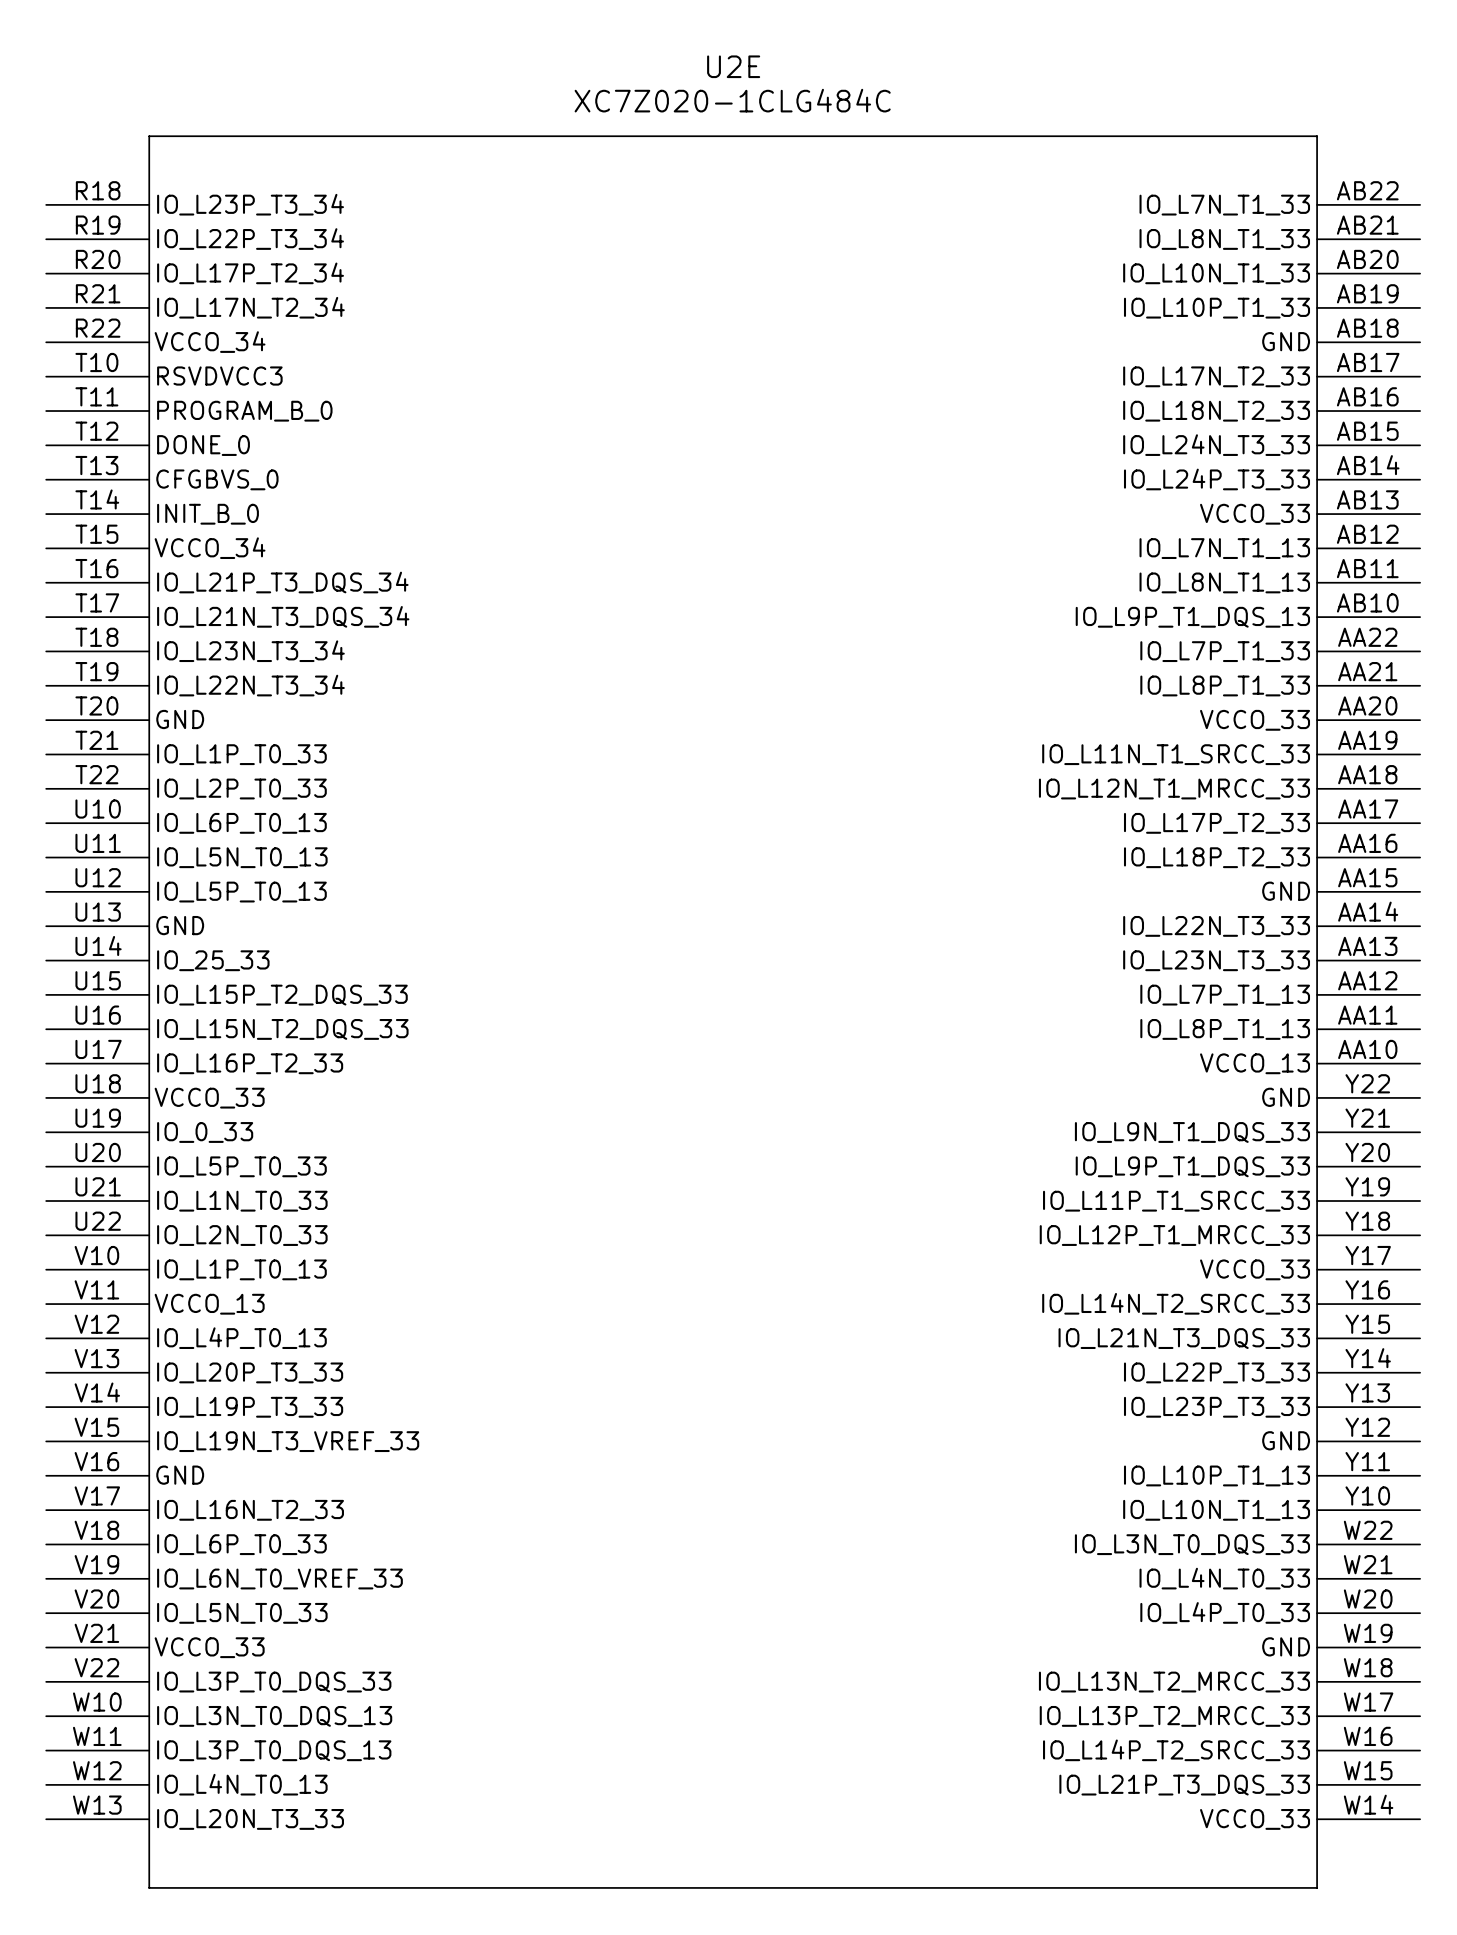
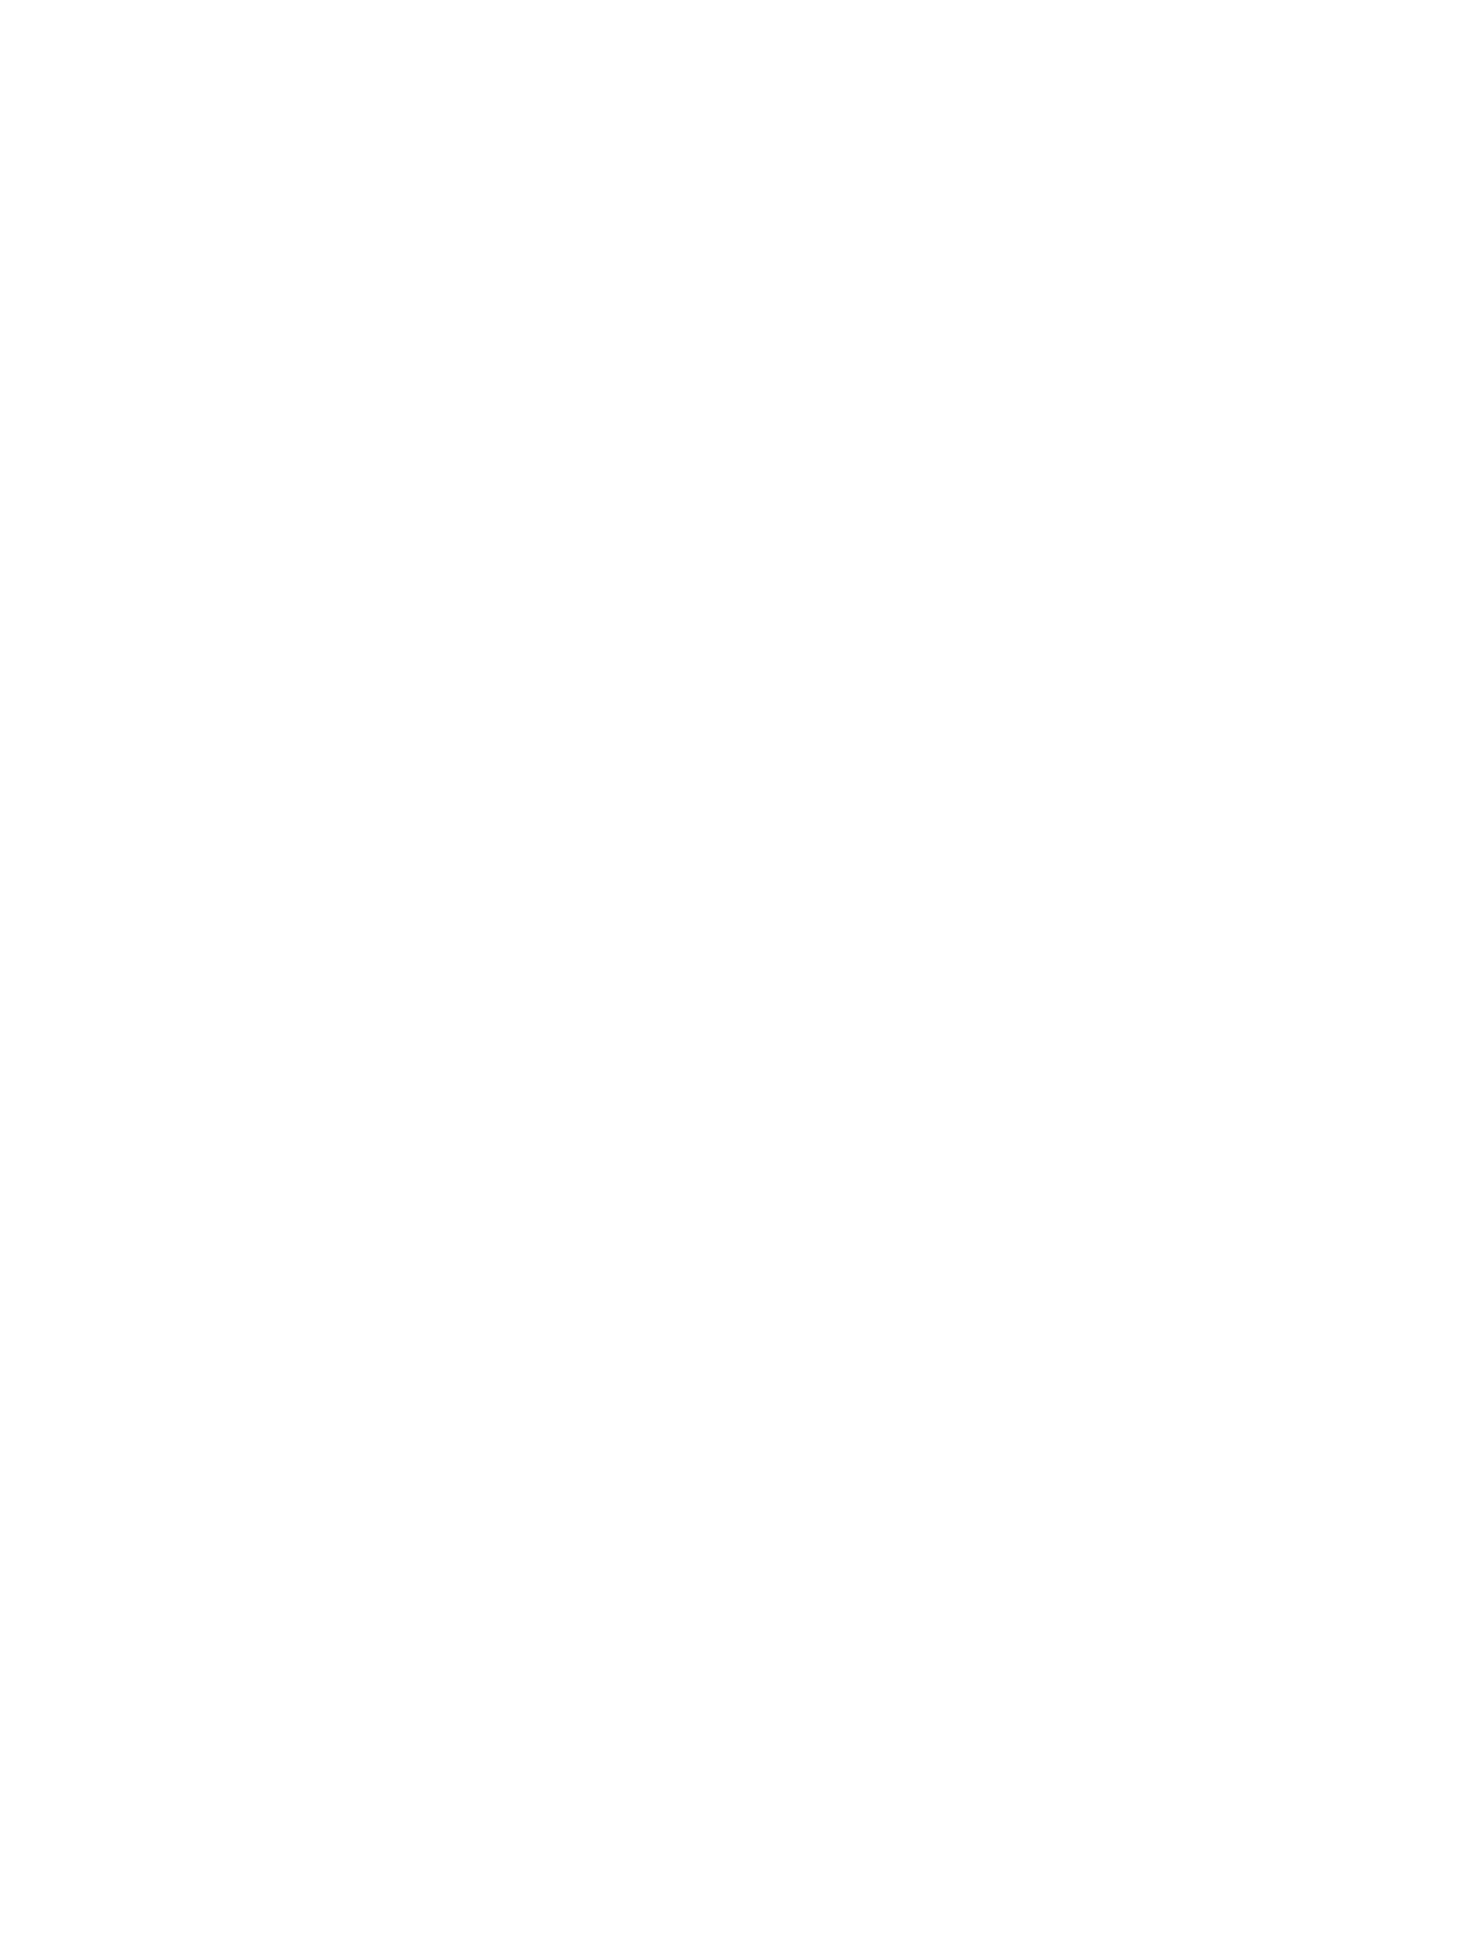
U2E: XC7Z020-1CLG484C (733, 1012) -> none

